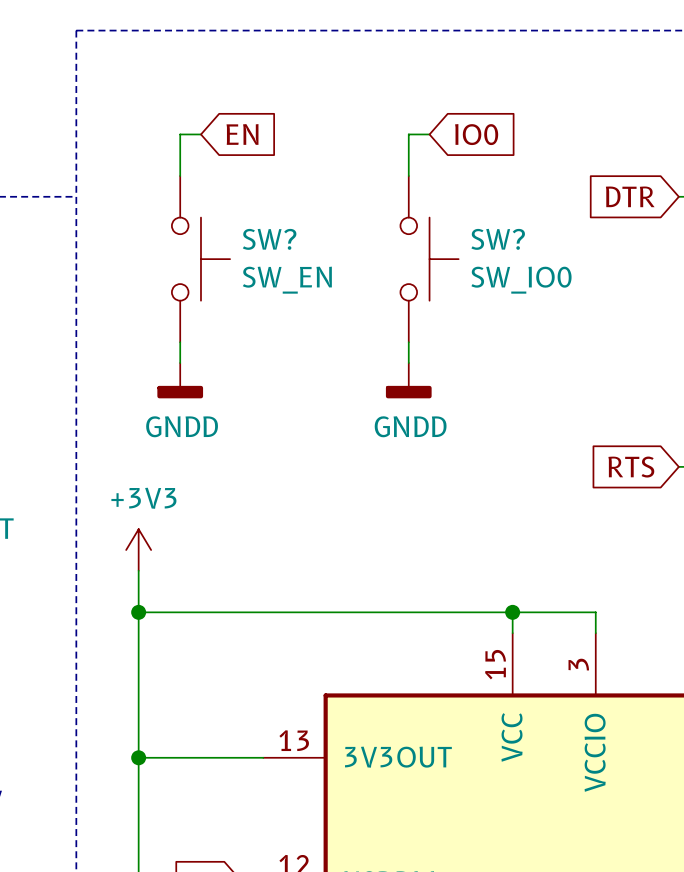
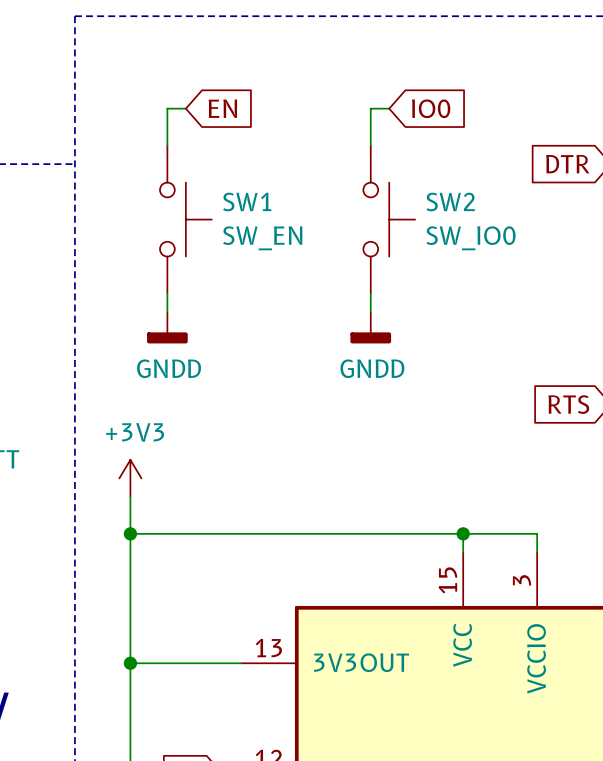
SW? name: SW? (269, 239) -> SW1 (247, 201)
SW? name: SW? (498, 239) -> SW2 (450, 201)

